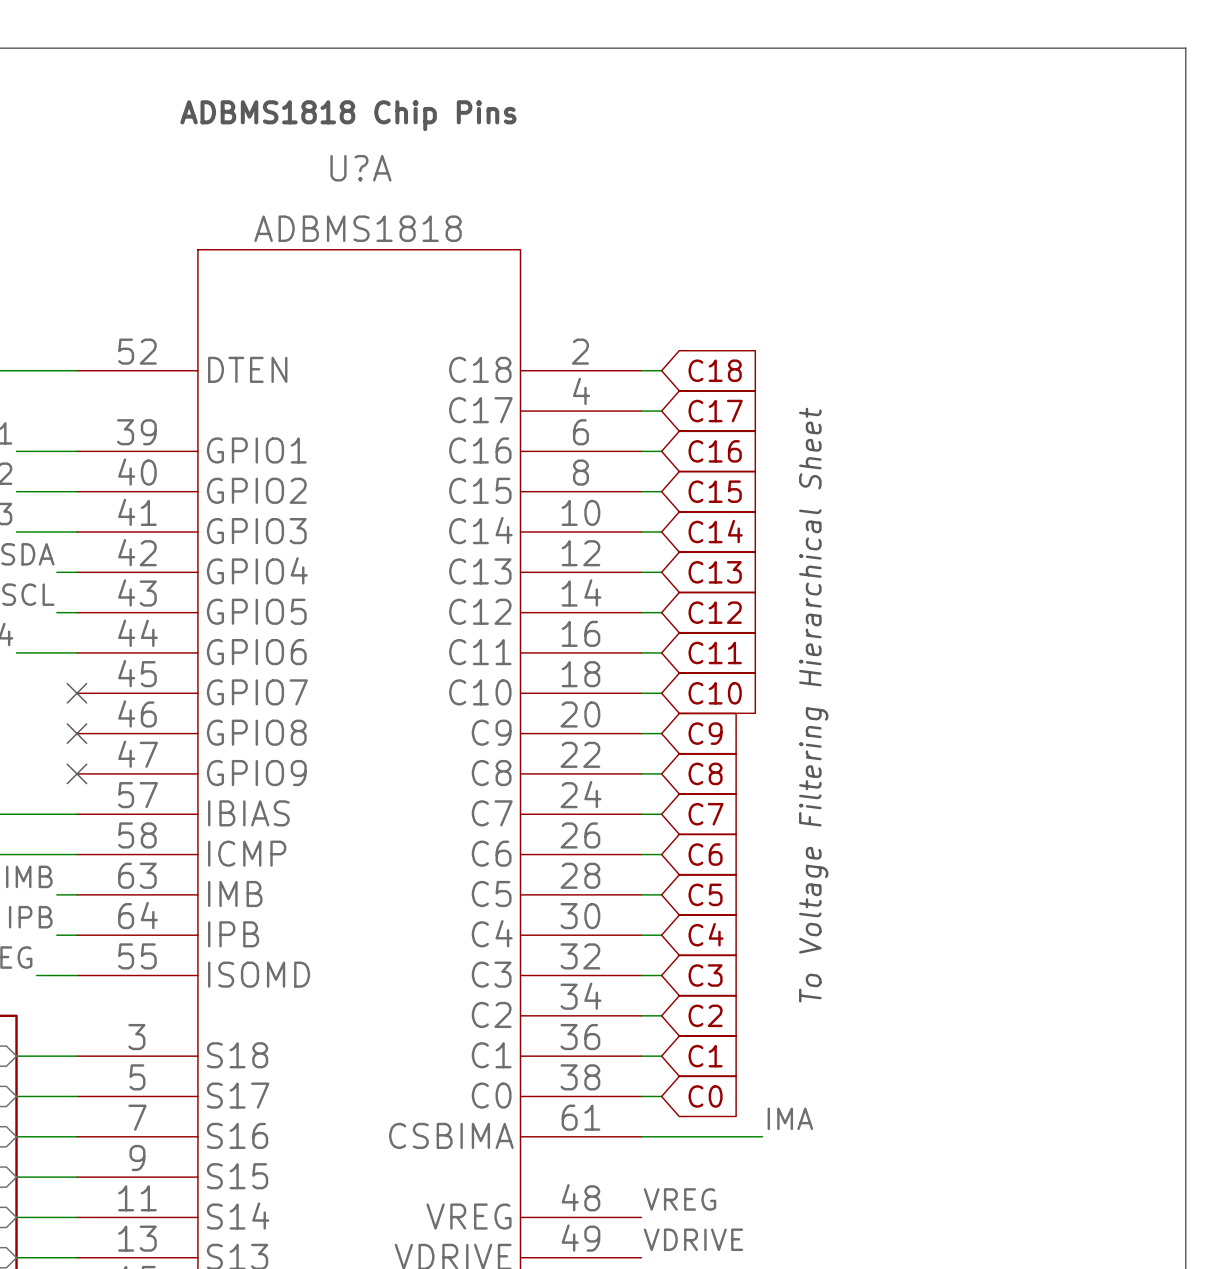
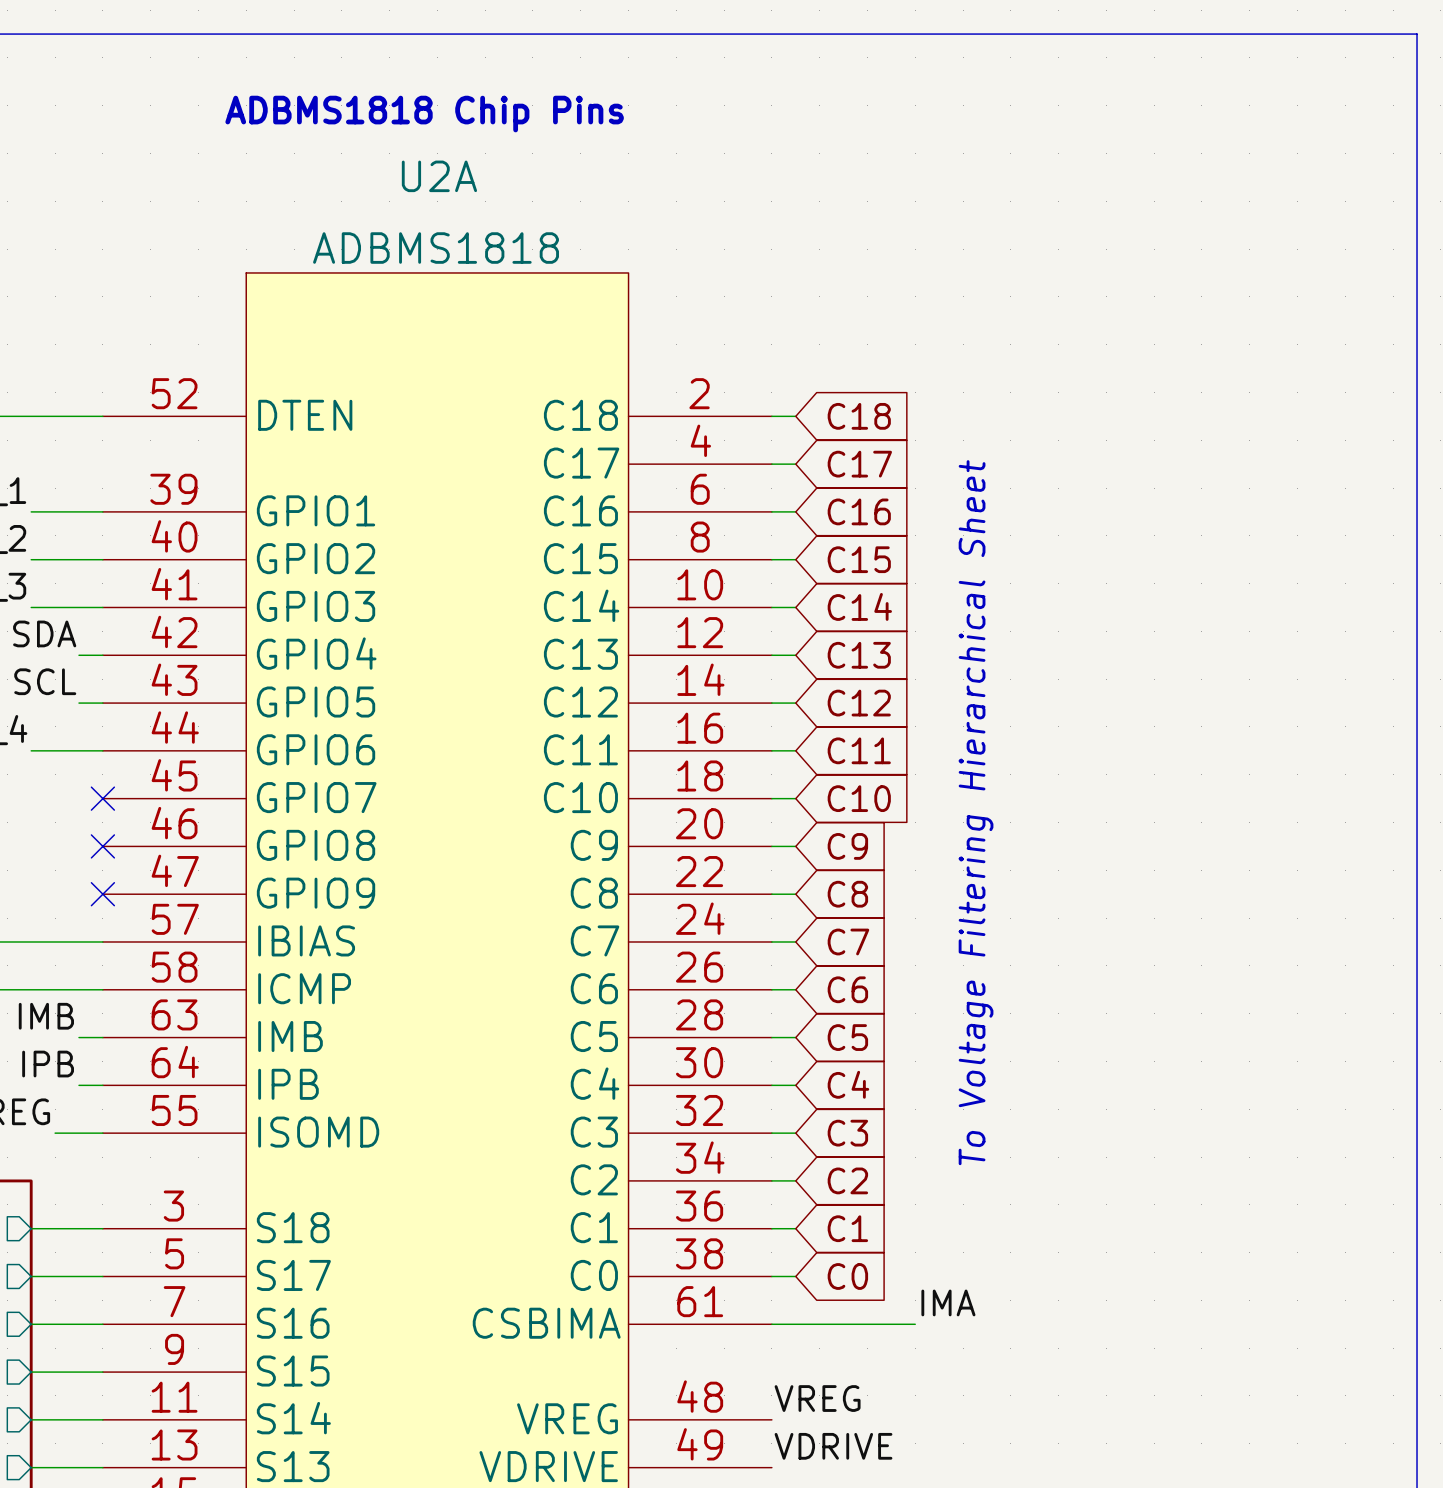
U?A name: U?A (360, 168) -> U2A (439, 176)

